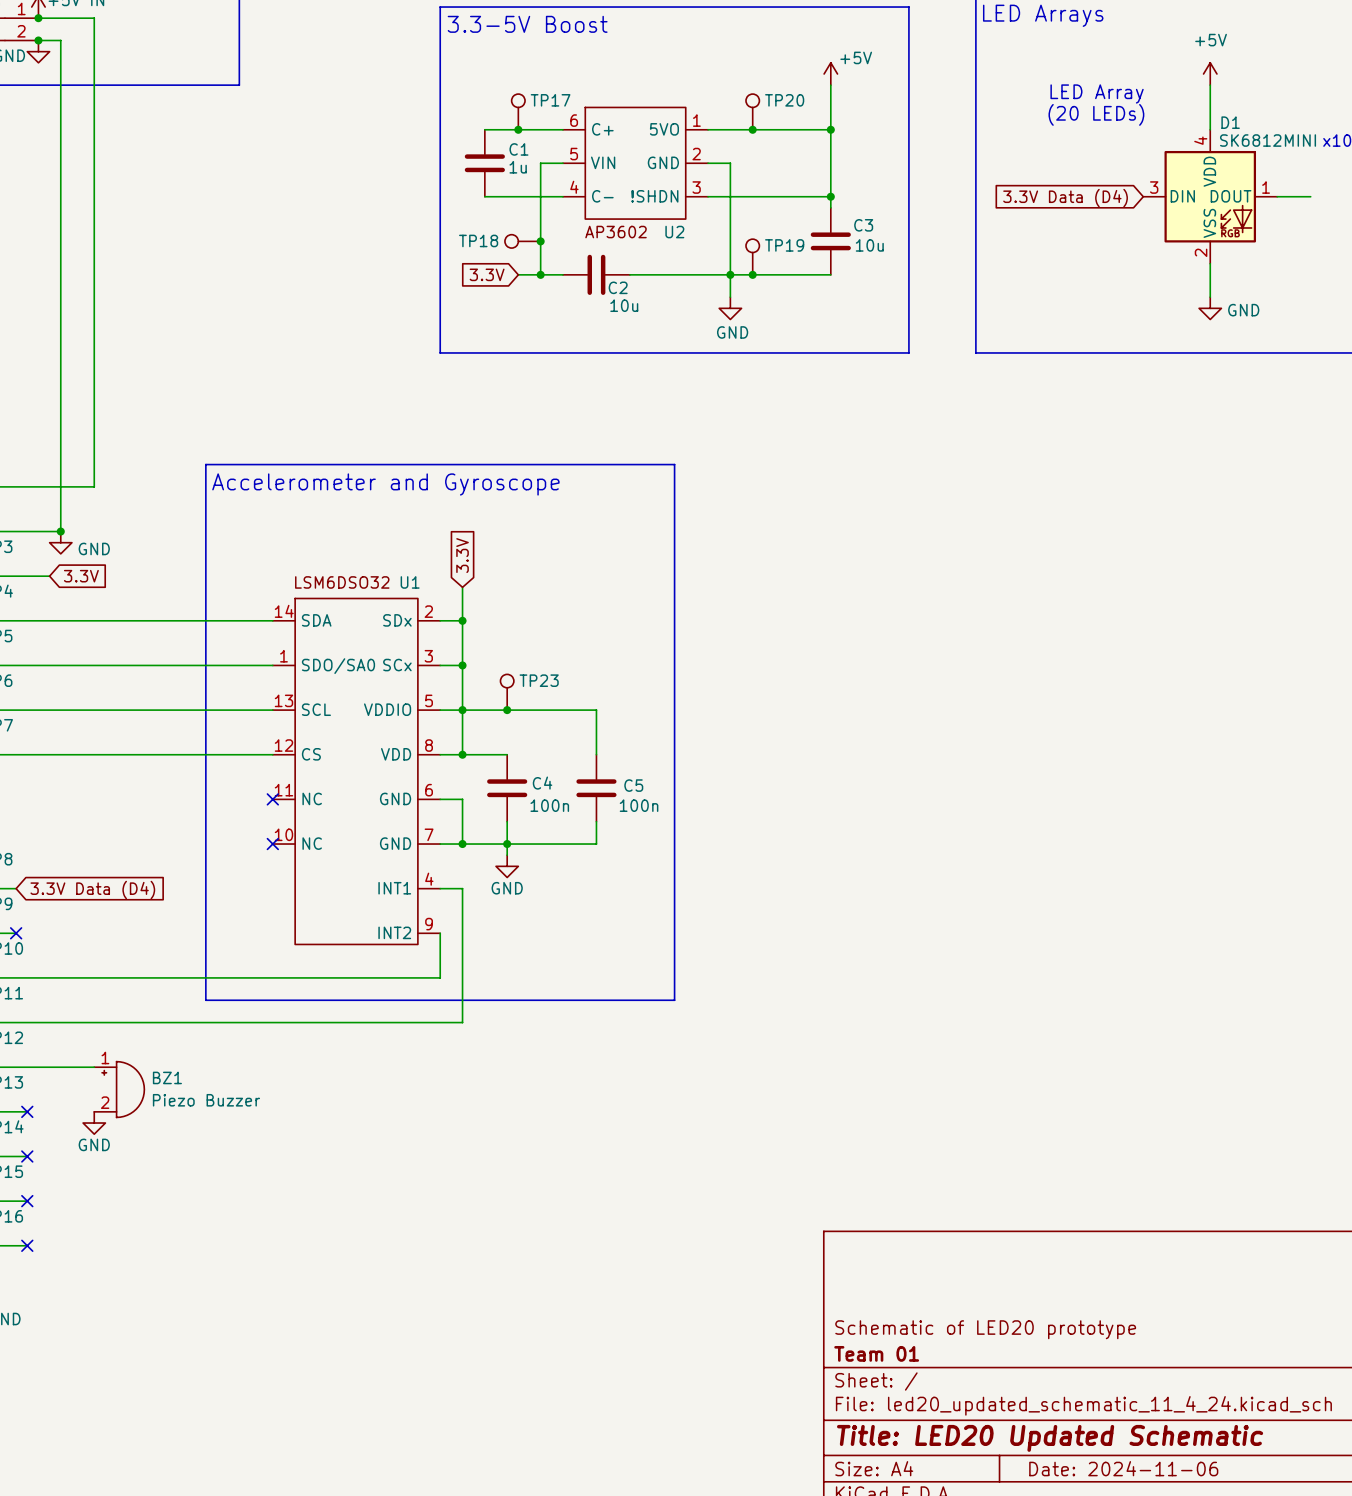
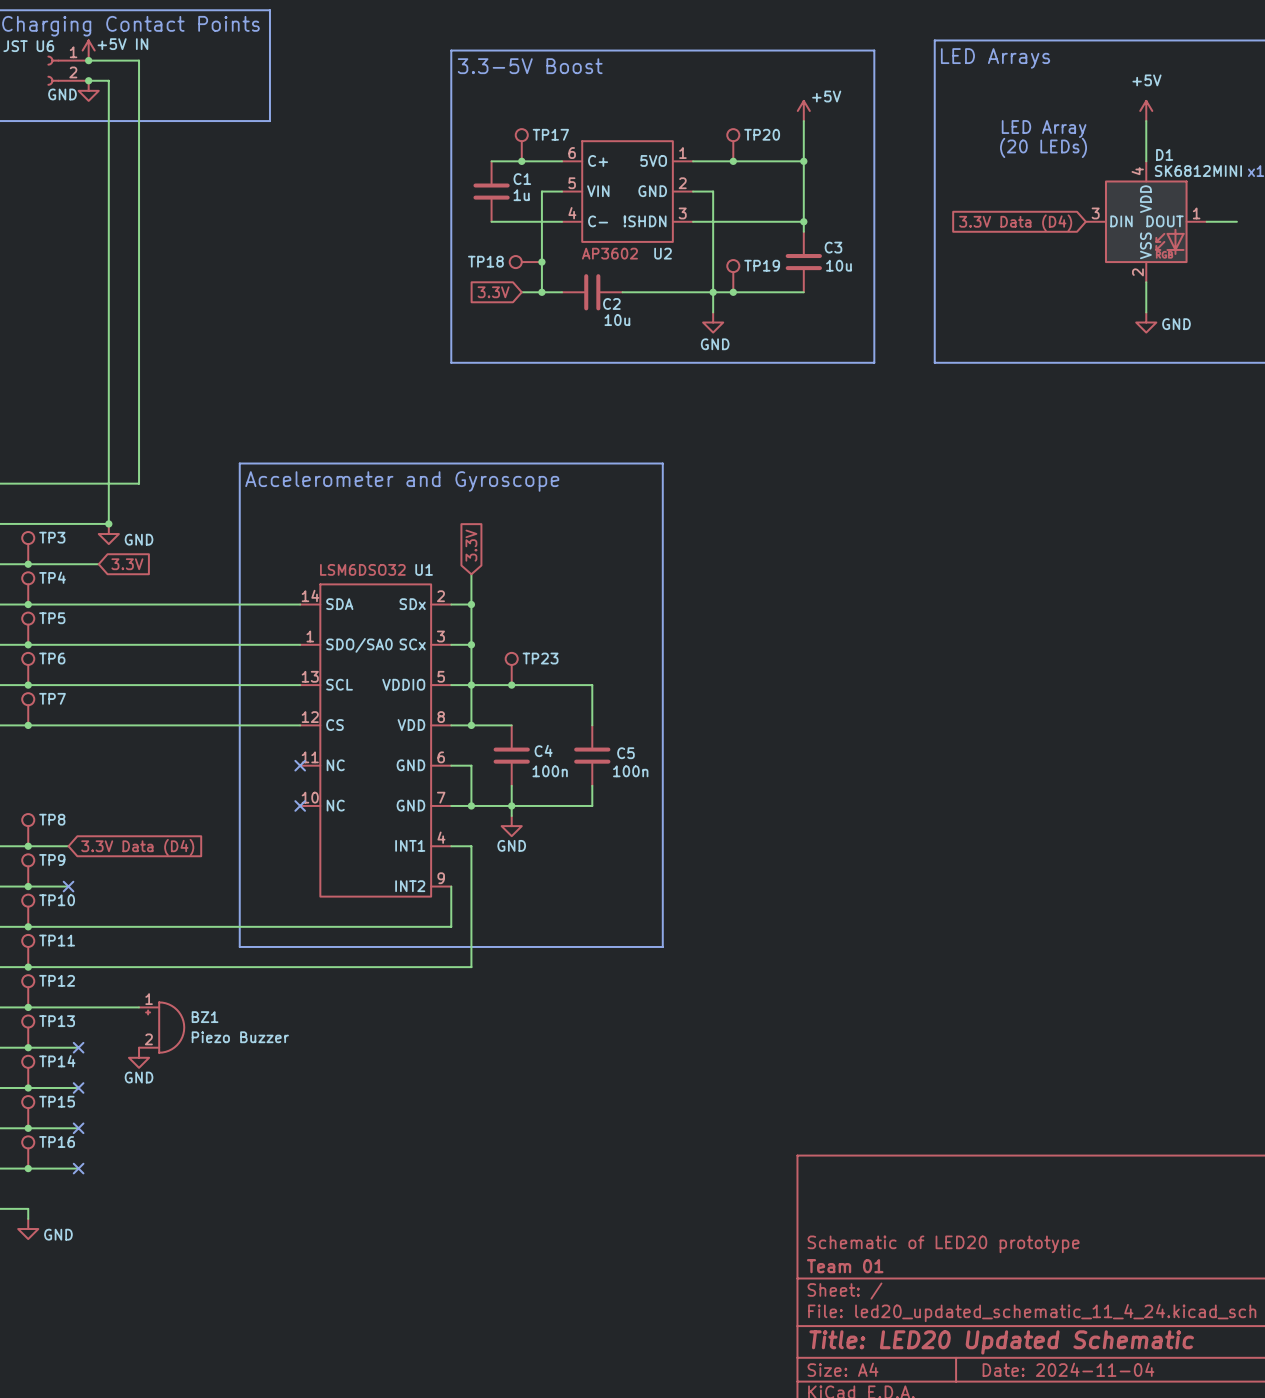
title block: Date: 2024-11-06 (1123, 1468) -> Date: 2024-11-04 (1068, 1369)

